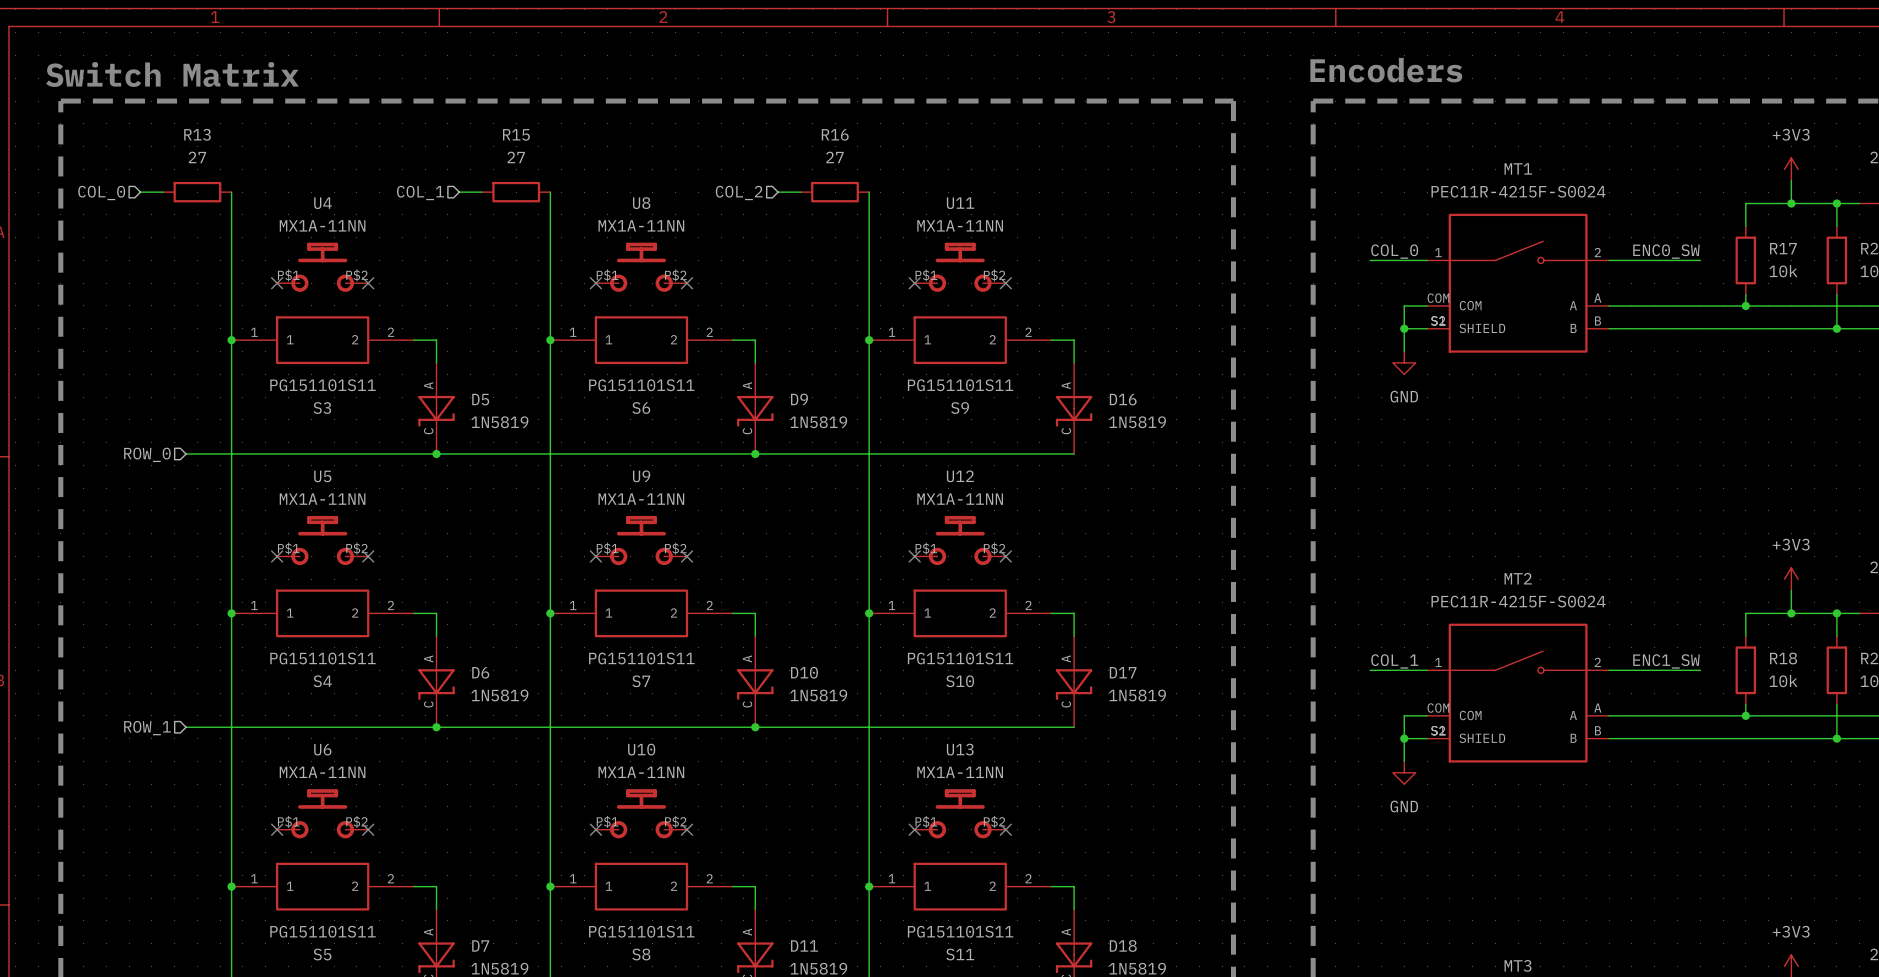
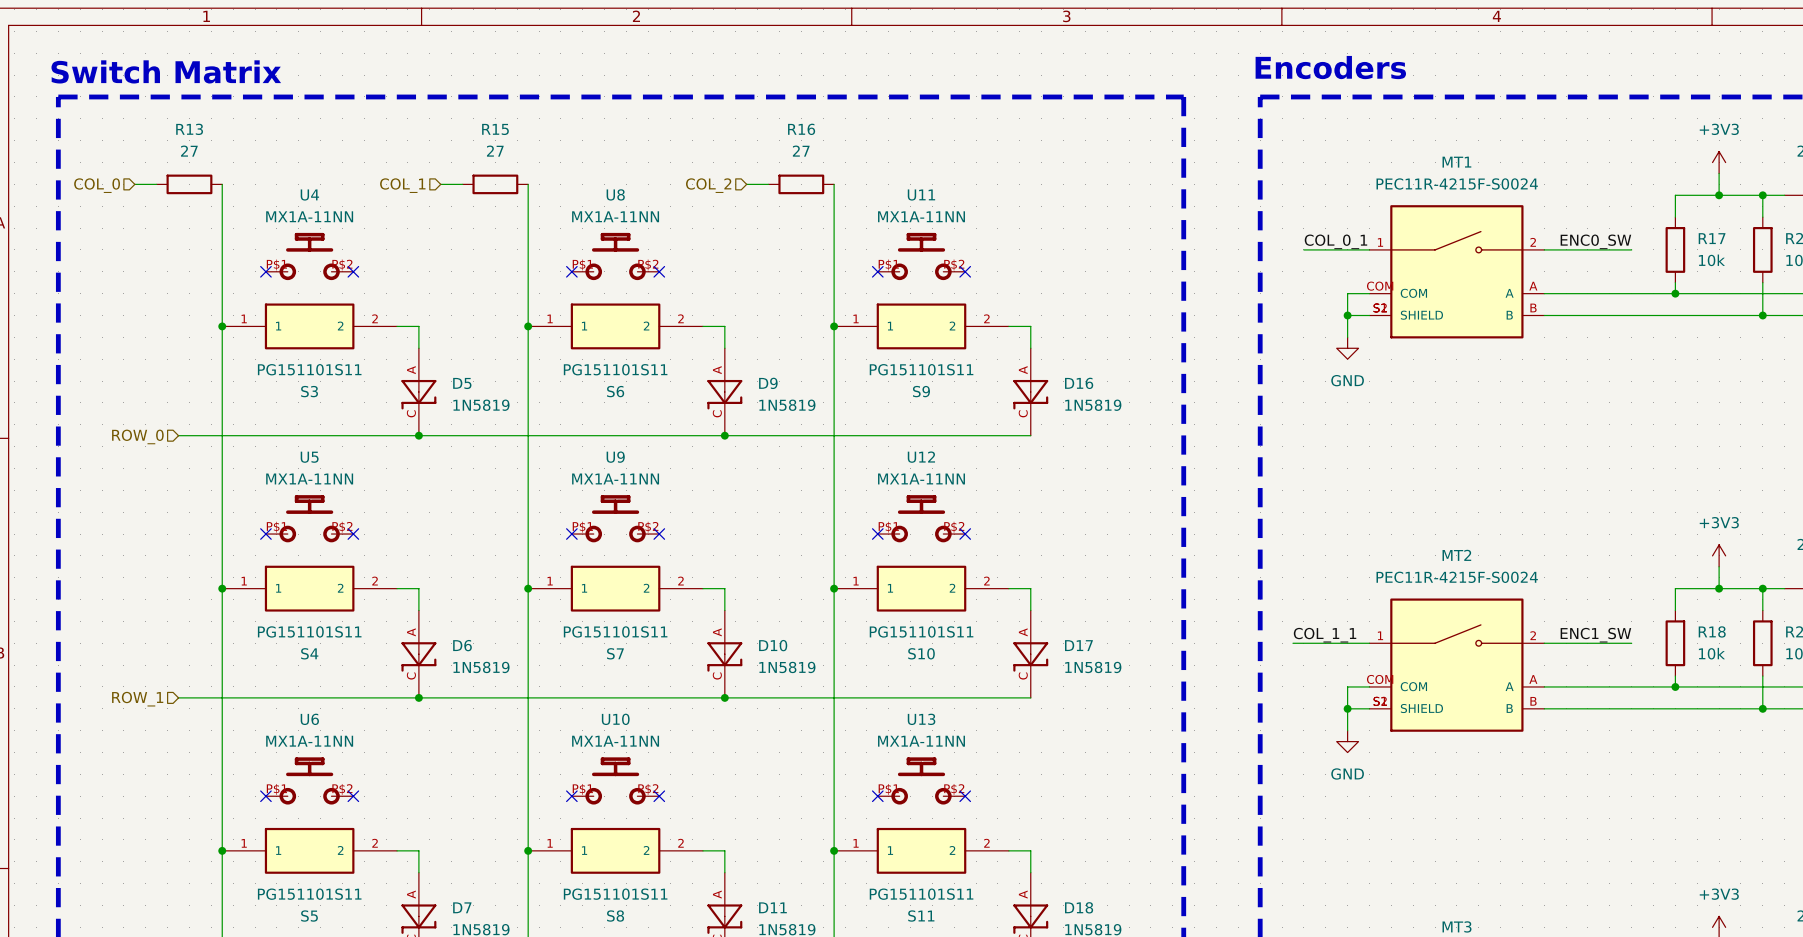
label: COL_0 (1394, 251) -> COL_0_1 (1335, 241)
wire: none -> (1303, 249) (1314, 249)
label: COL_1 (1394, 661) -> COL_1_1 (1325, 635)
wire: none -> (1292, 643) (1314, 643)

